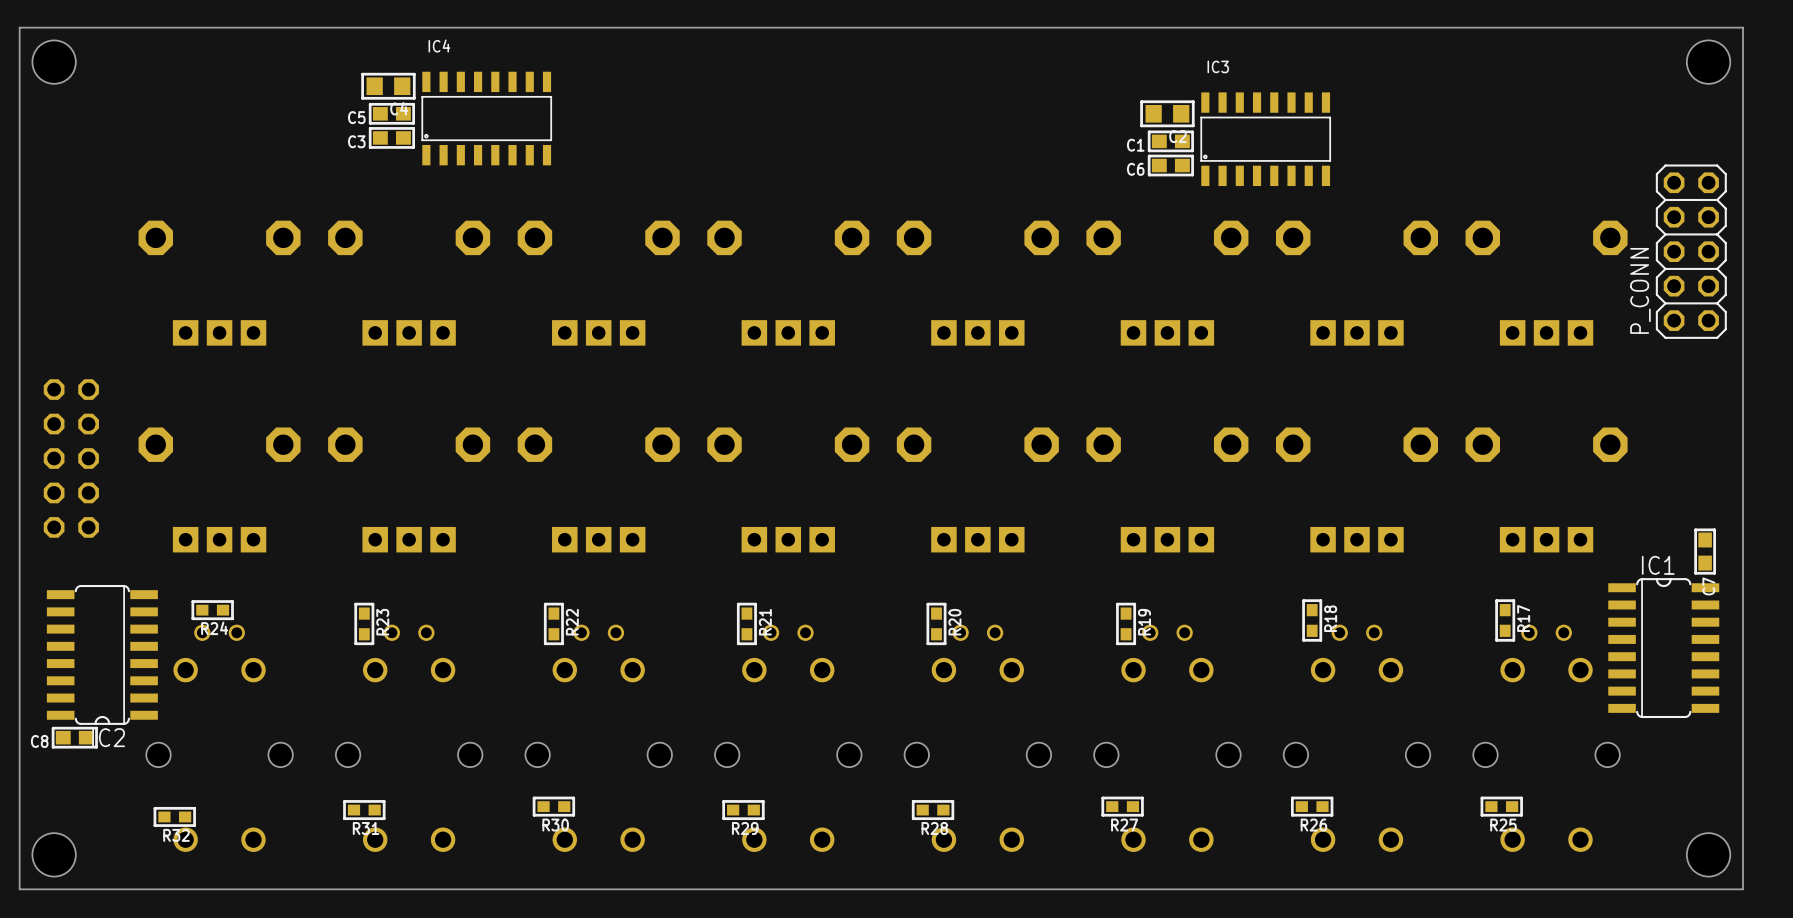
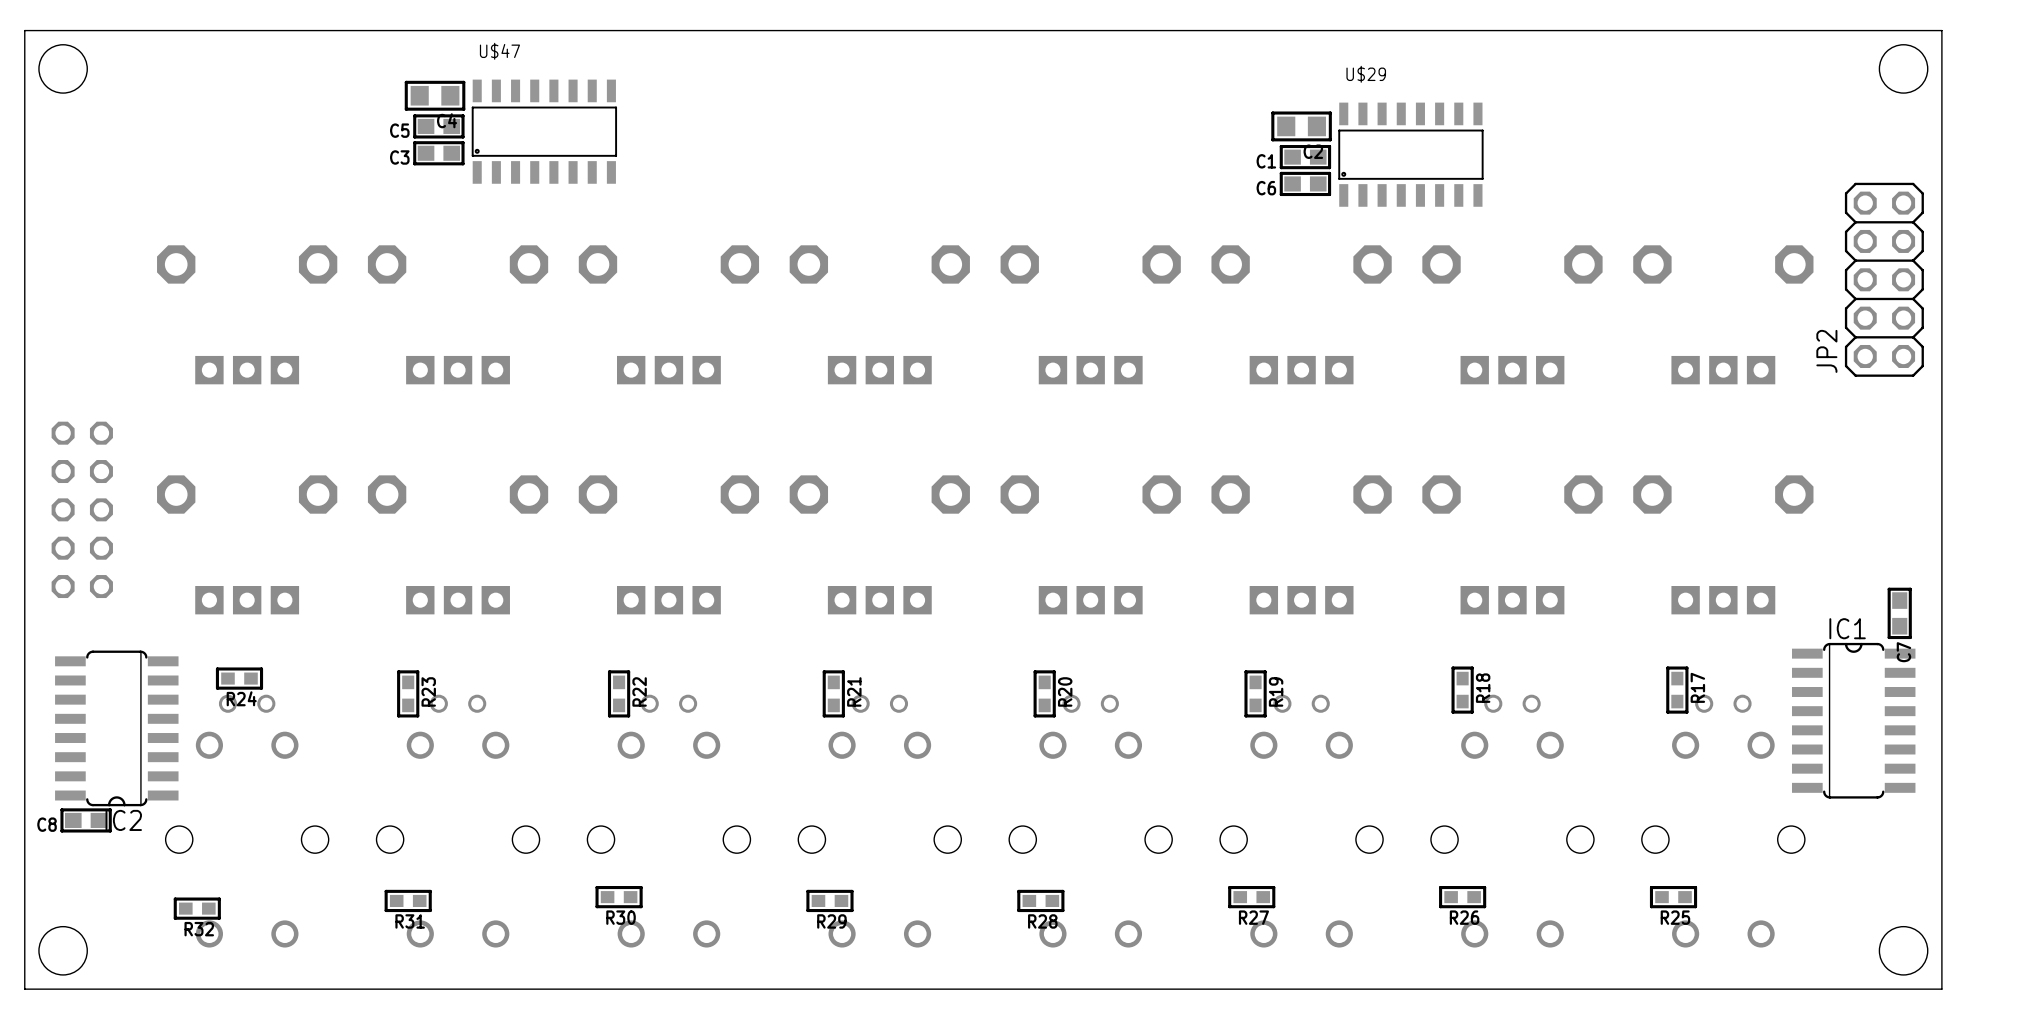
IC4 name: IC4 (439, 45) -> U$47 (499, 51)
IC3 name: IC3 (1218, 66) -> U$29 (1366, 74)
P_CONN name: P_CONN (1640, 290) -> JP2 (1826, 351)

